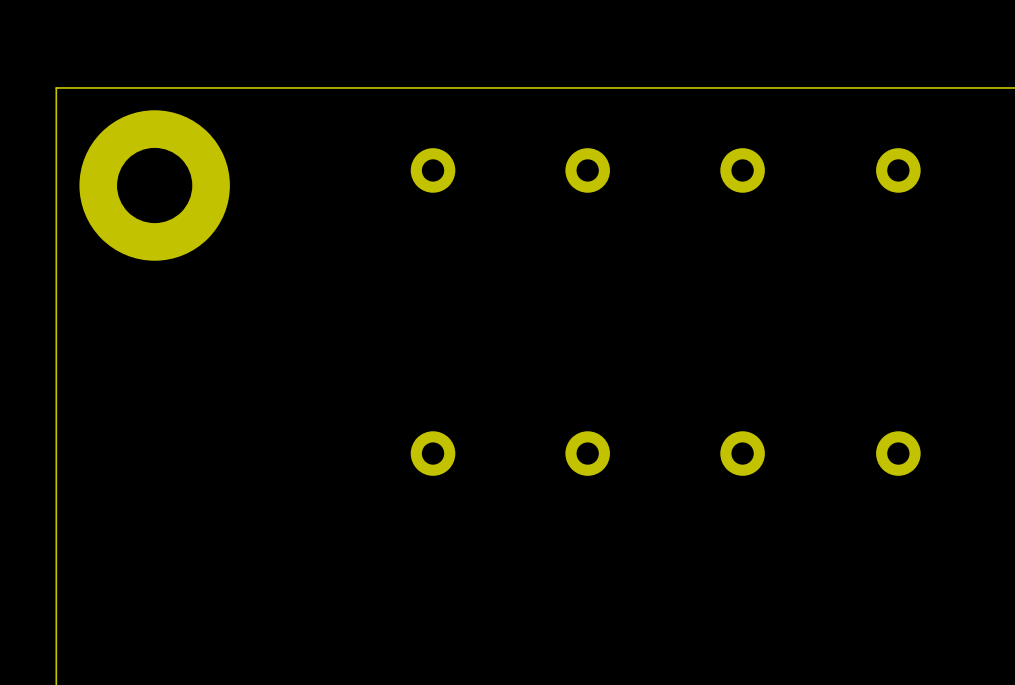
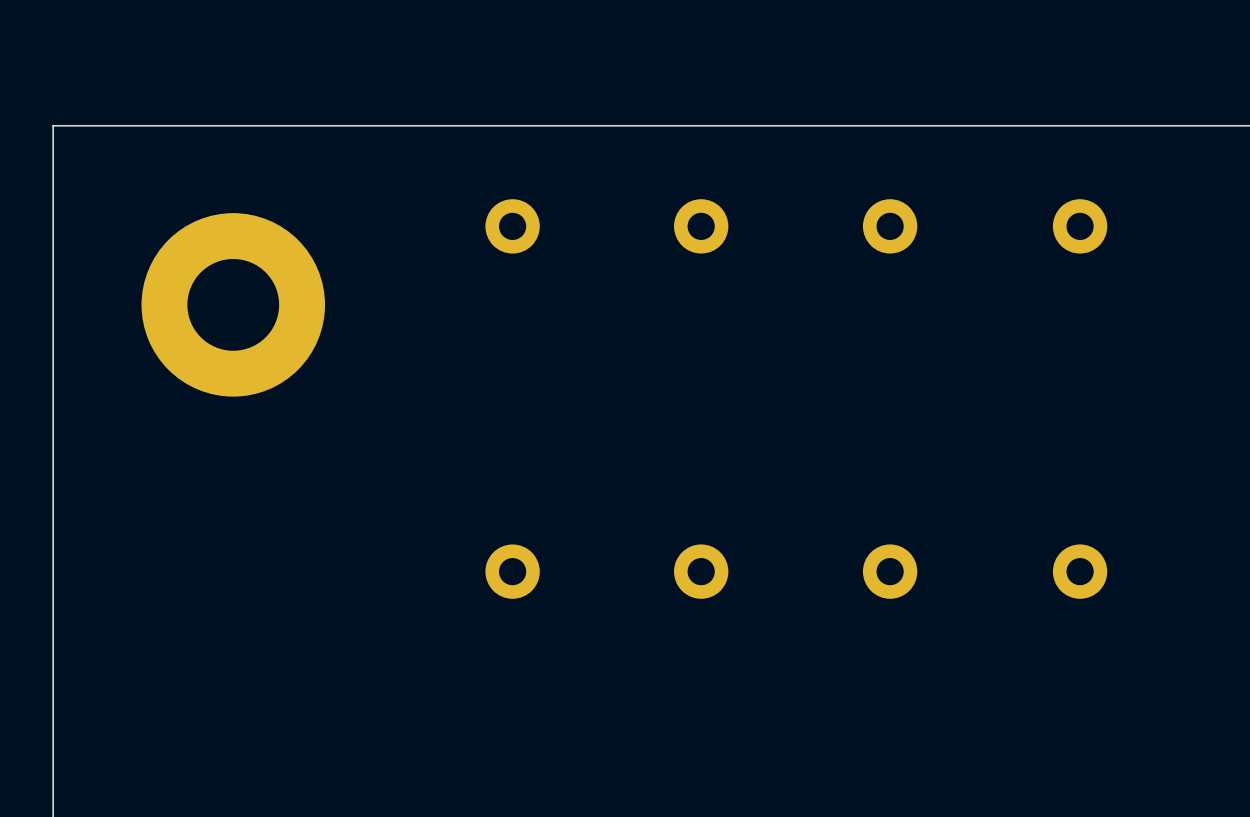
part position: (154, 185) -> (233, 304)

